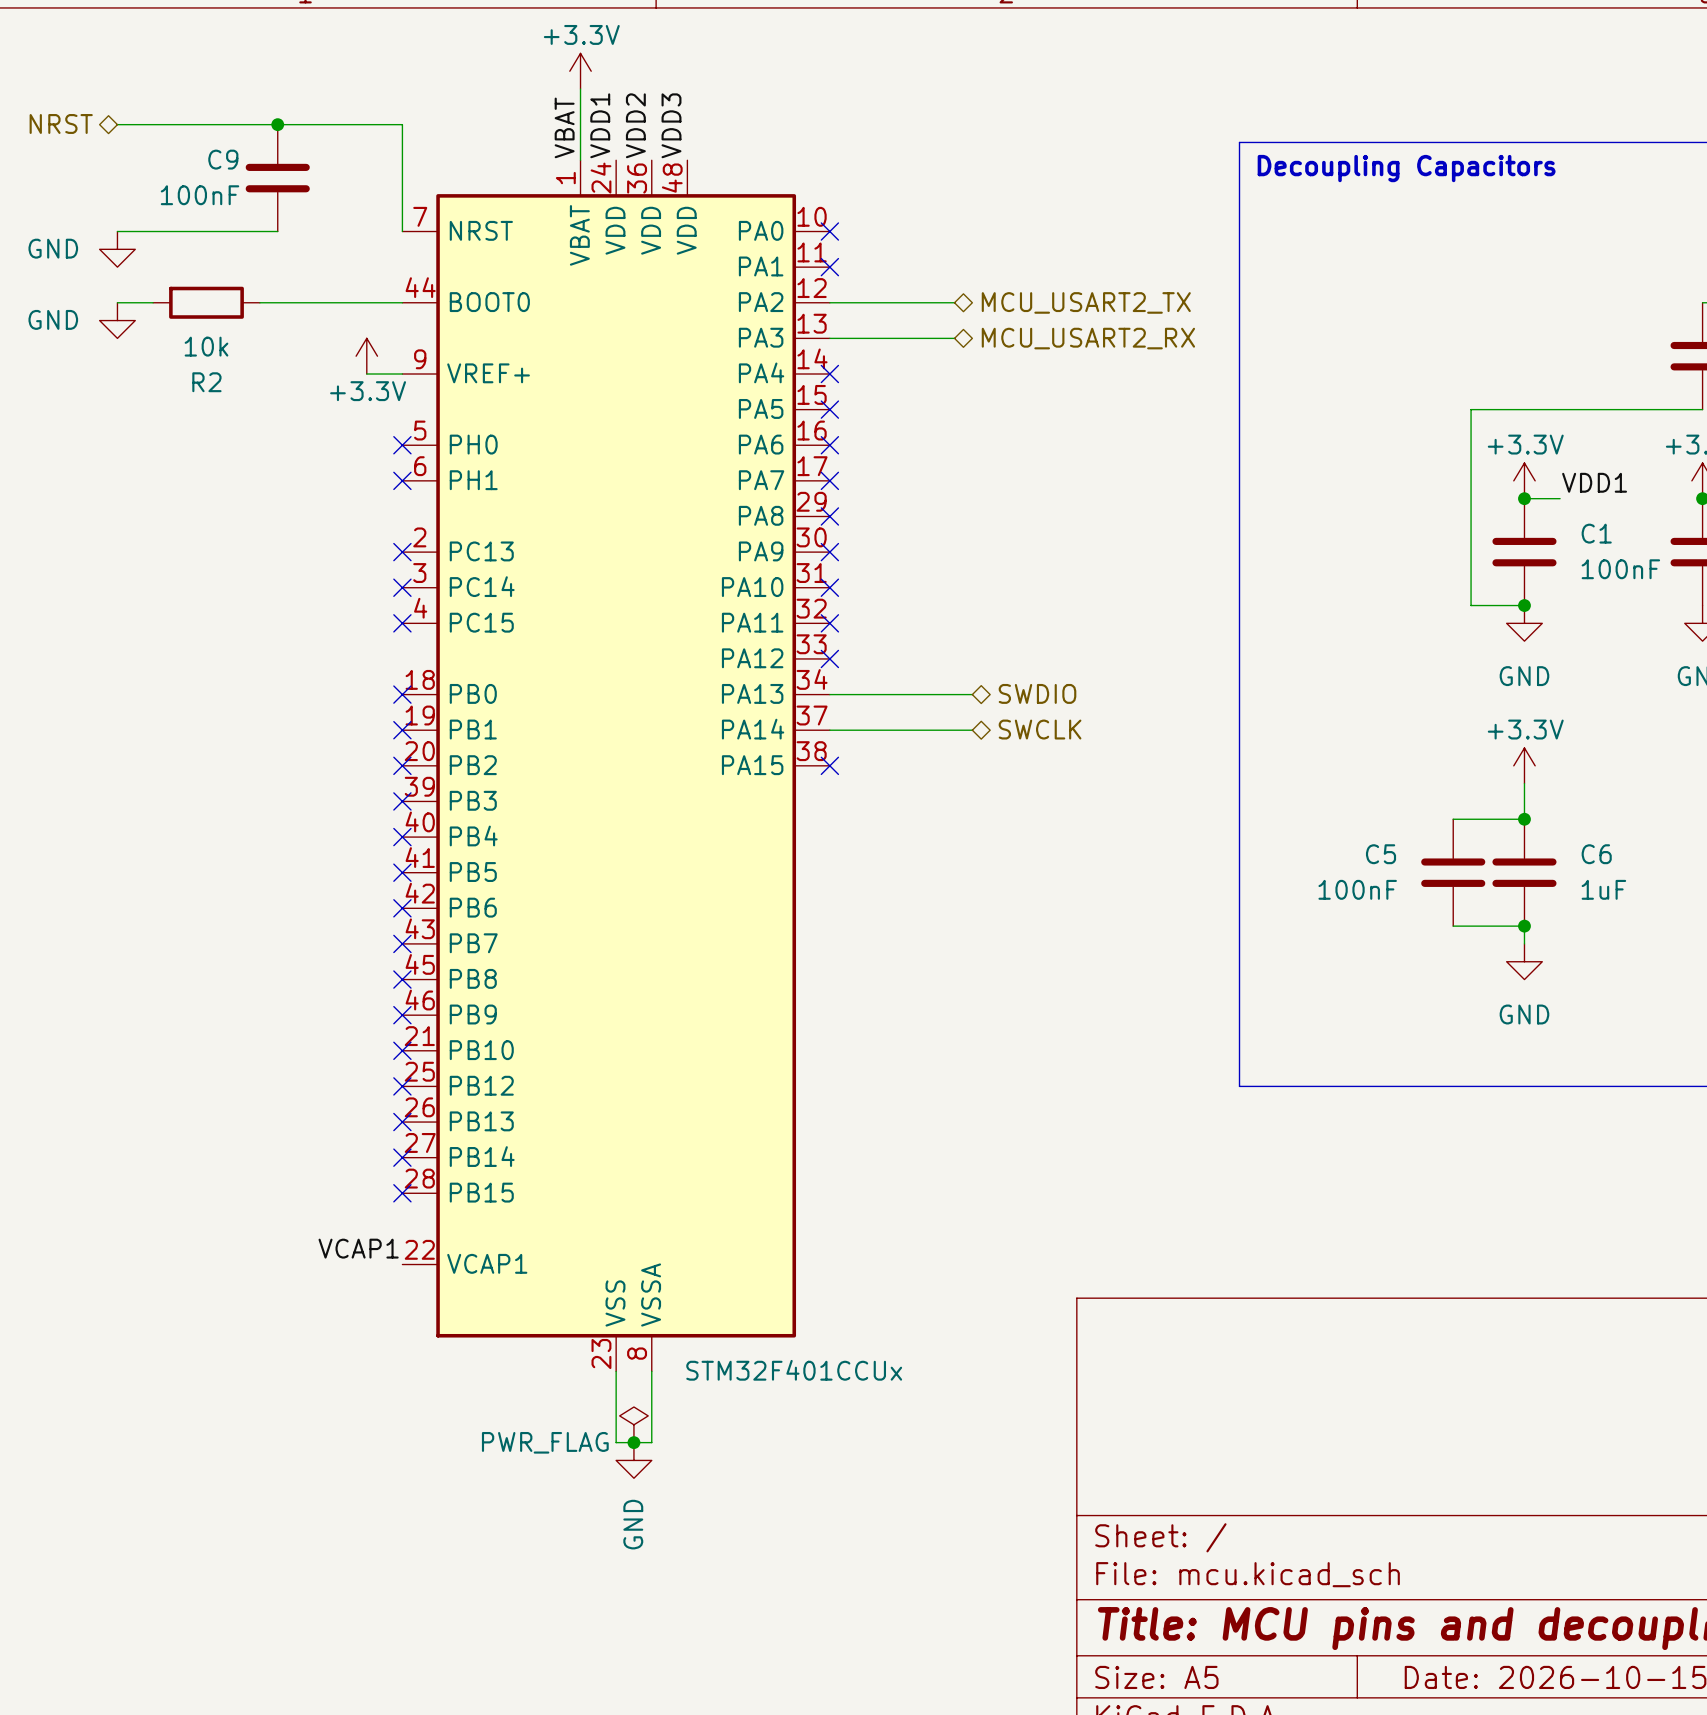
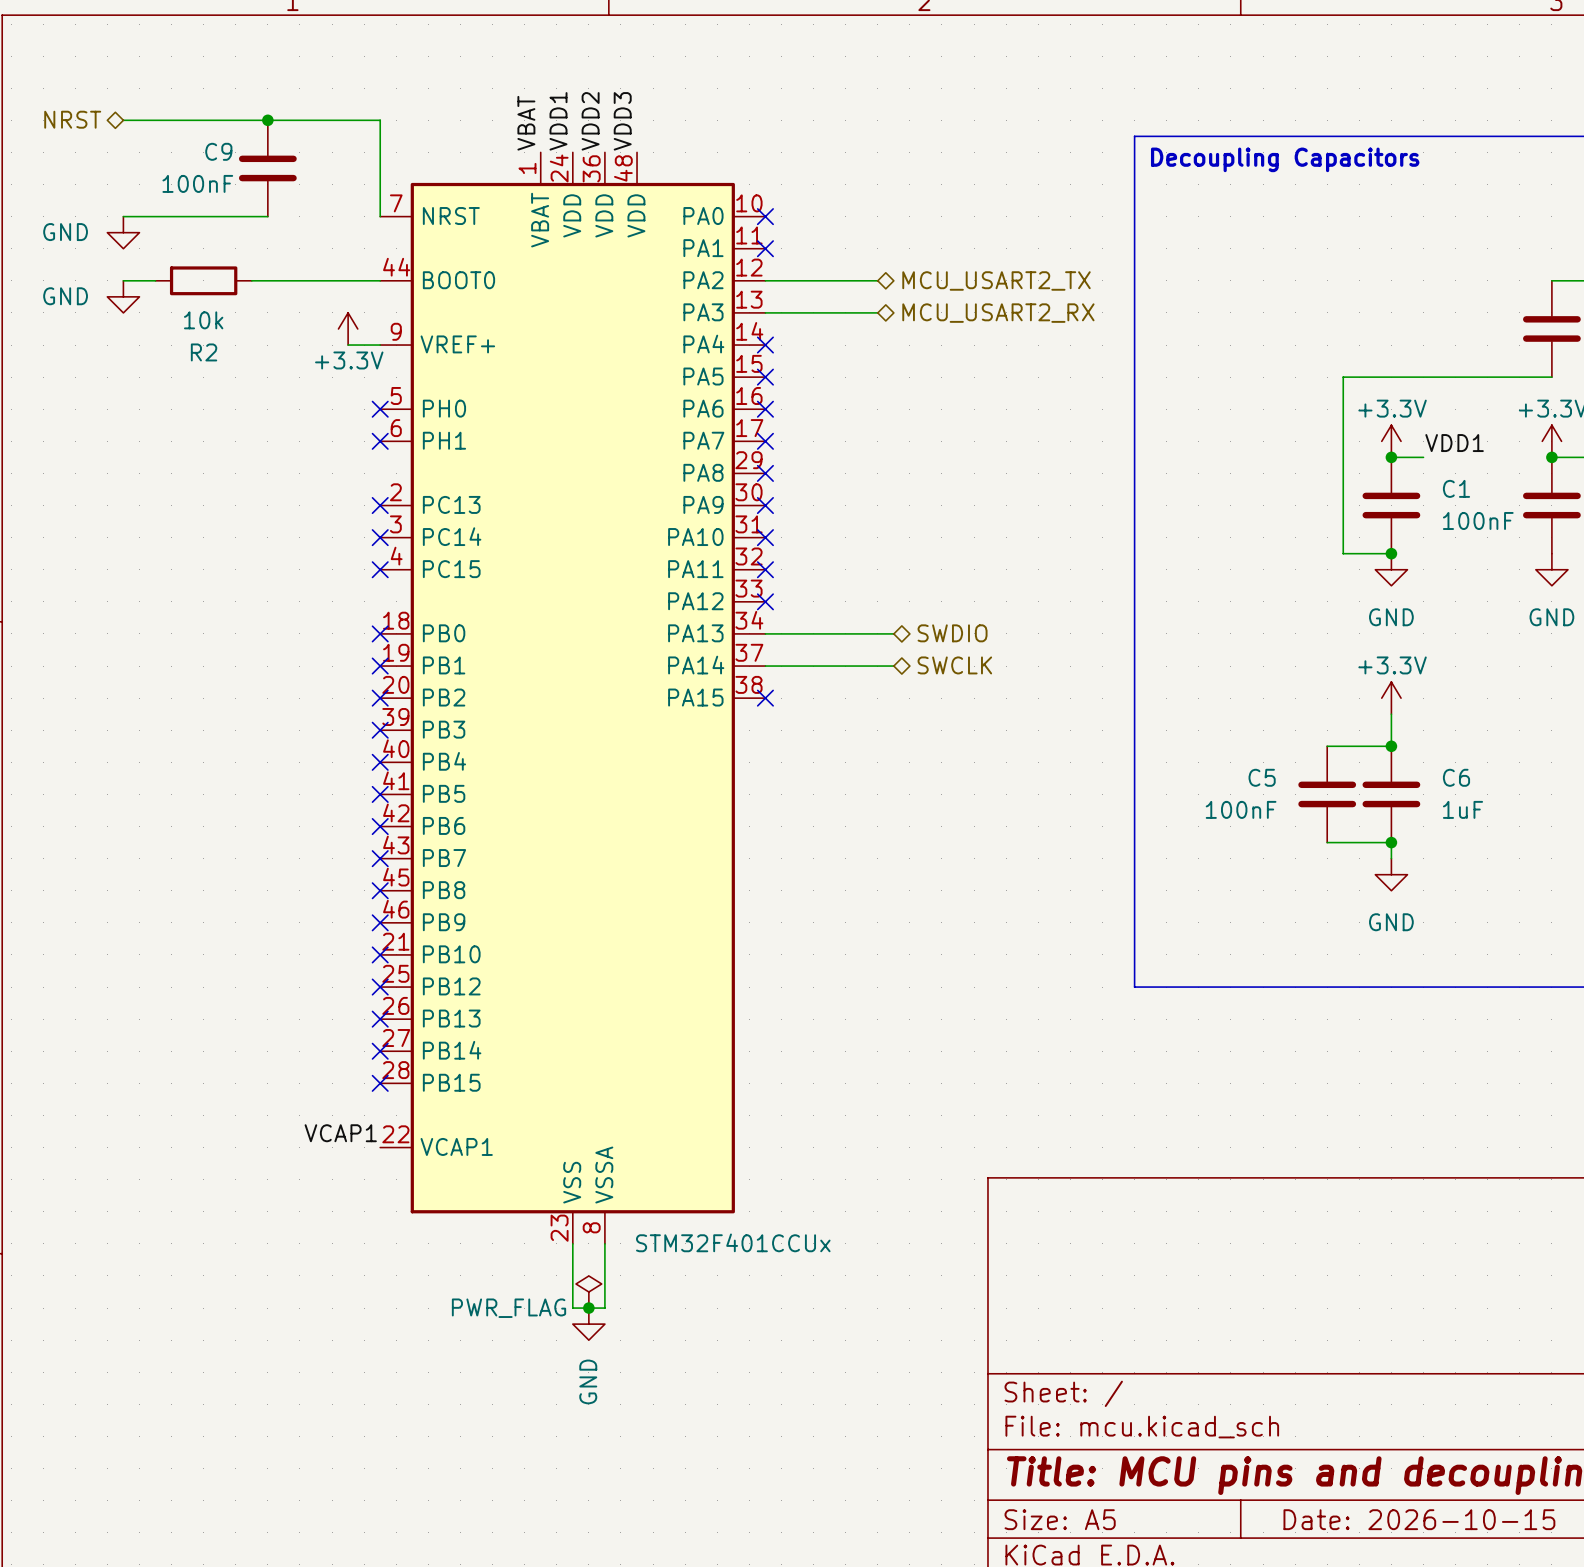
power symbol: +3.3V (580, 71) -> none
wire: (580, 89) (580, 160) -> none

